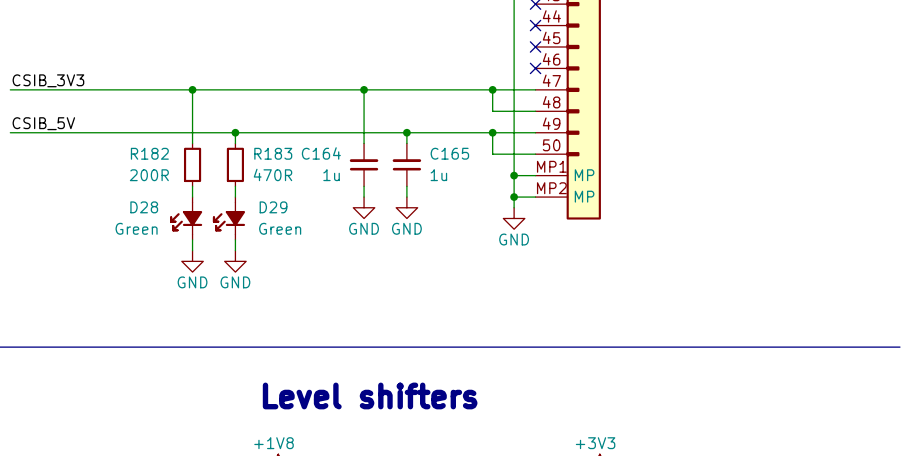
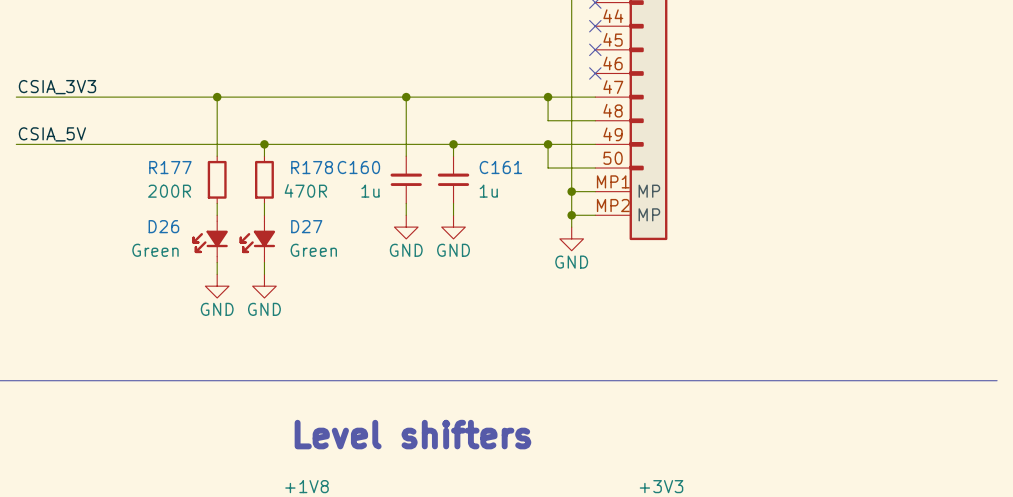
label: CSIB_3V3 (48, 80) -> CSIA_3V3 (57, 87)
label: CSIB_5V (43, 123) -> CSIA_5V (52, 134)
R182 name: R182 (149, 153) -> R177 (170, 167)
R183 name: R183 (273, 153) -> R178 (312, 167)
C164 name: C164 (321, 153) -> C160 (358, 167)
C165 name: C165 (449, 153) -> C161 (500, 167)
D28 name: D28 (144, 207) -> D26 (163, 226)
D29 name: D29 (273, 207) -> D27 (306, 226)

